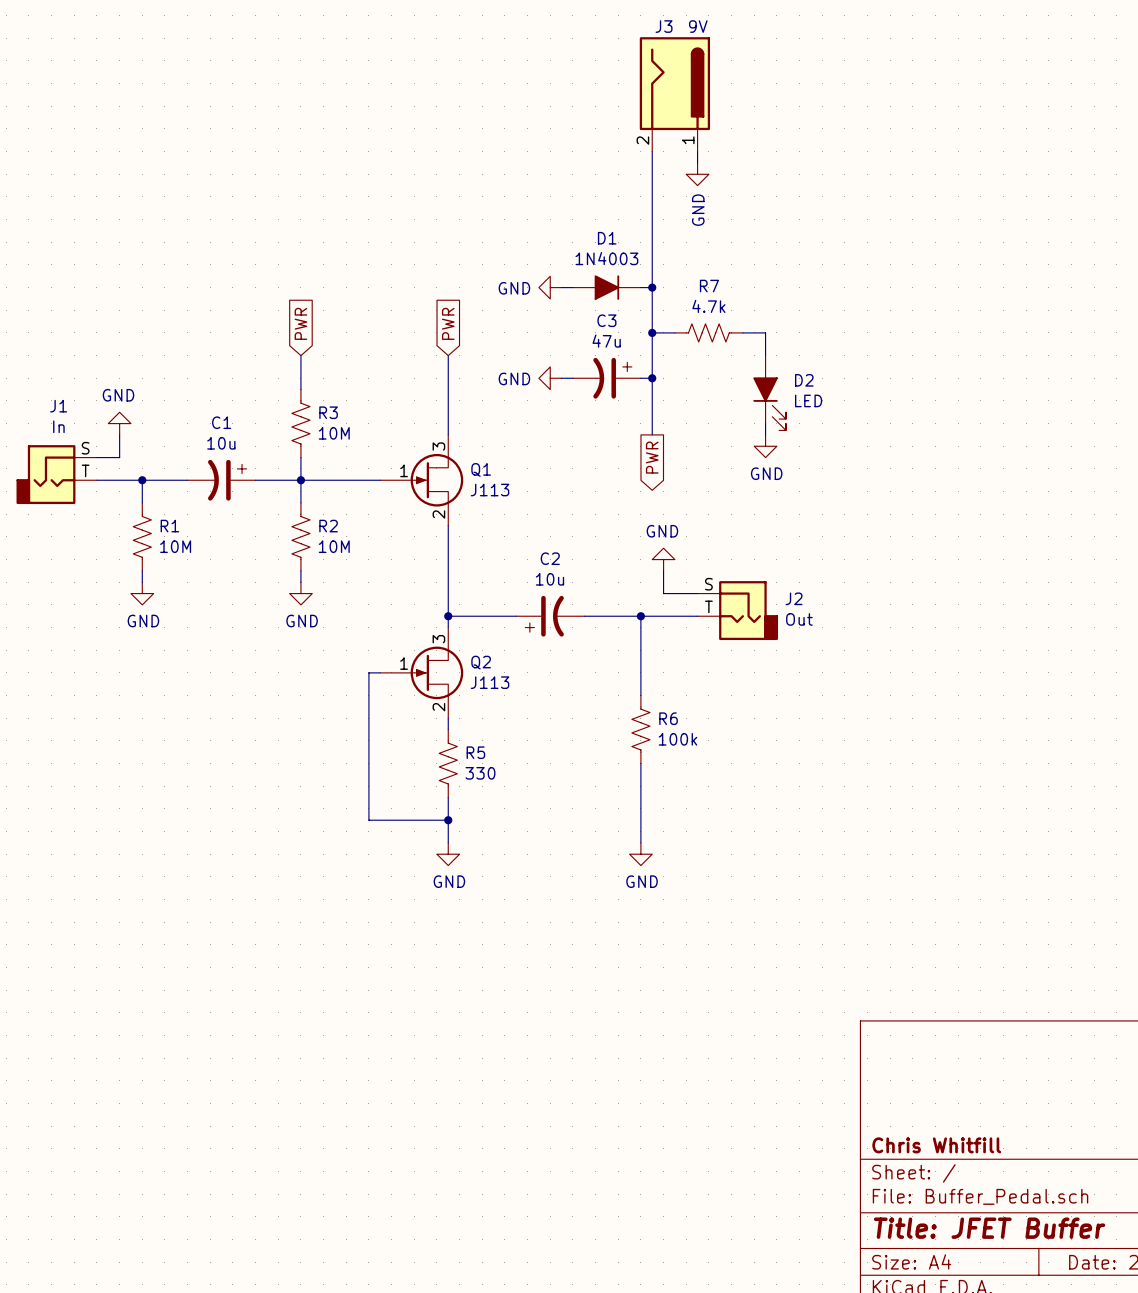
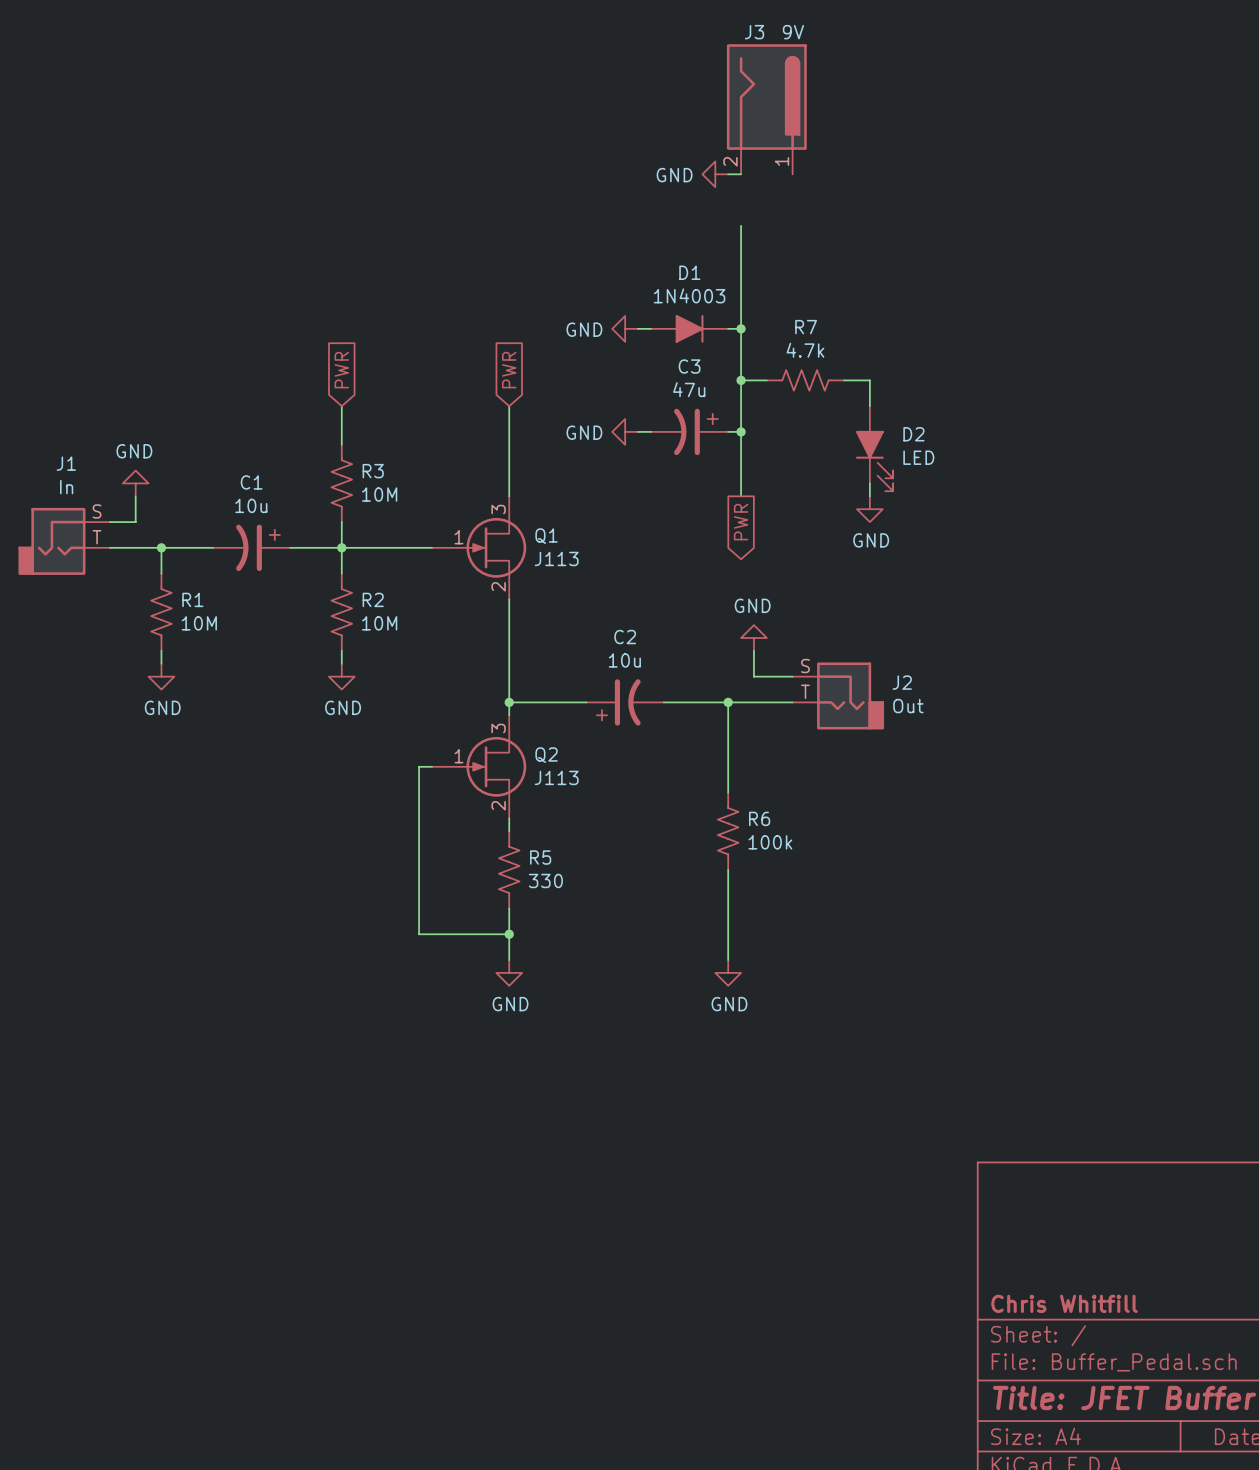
wire: (652, 151) (652, 196) -> (741, 174) (728, 174)
wire: (697, 151) (697, 162) -> none
power symbol rotation: 0° (697, 174) -> 90° clockwise (715, 174)
power symbol position: GND (697, 174) -> GND (715, 174)

